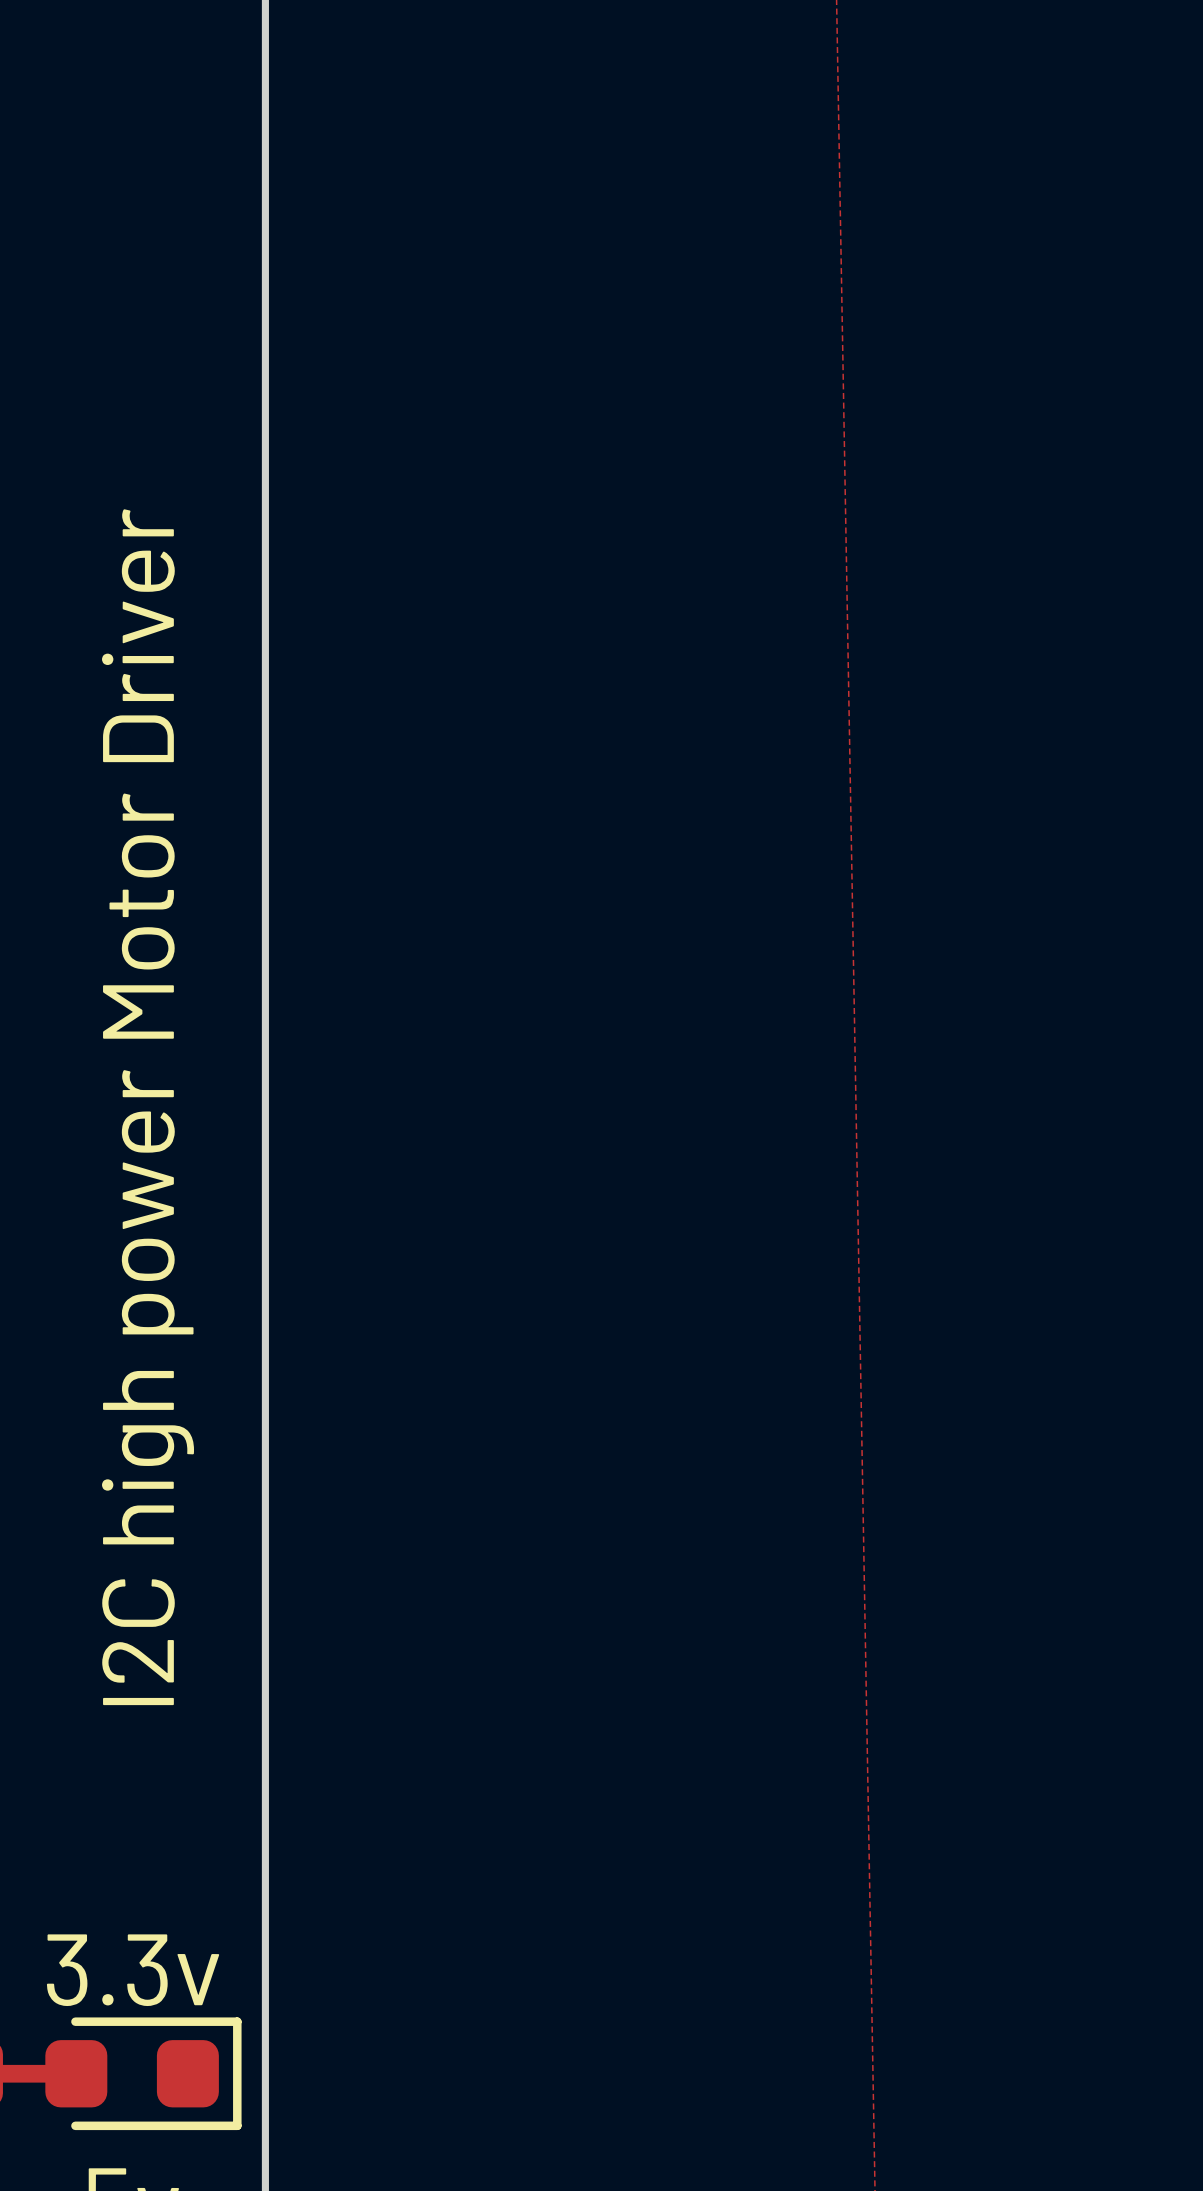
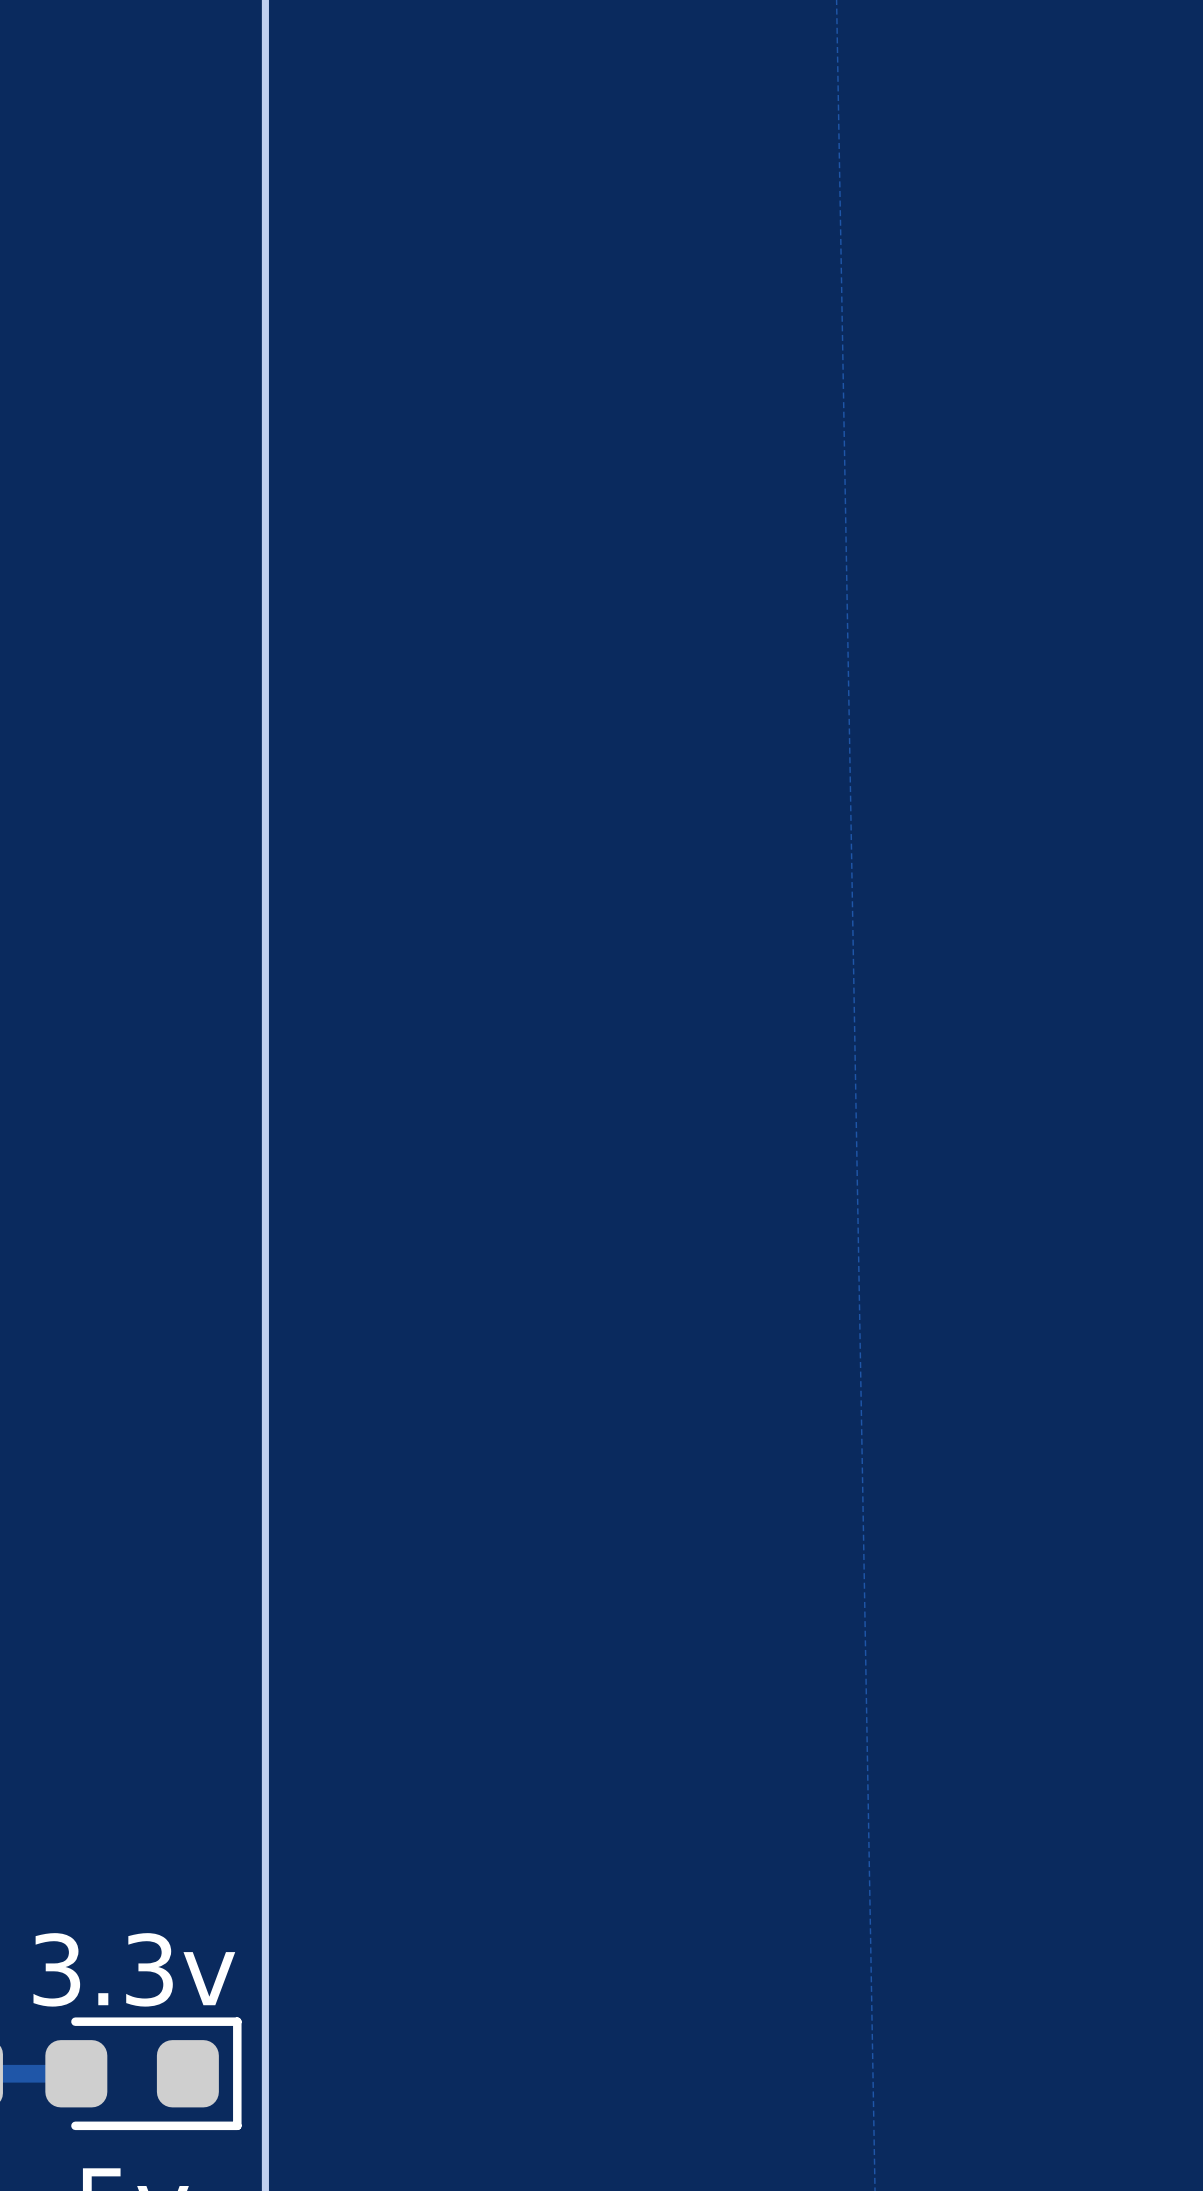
text: I2C high power Motor Driver (148, 1107) -> none

